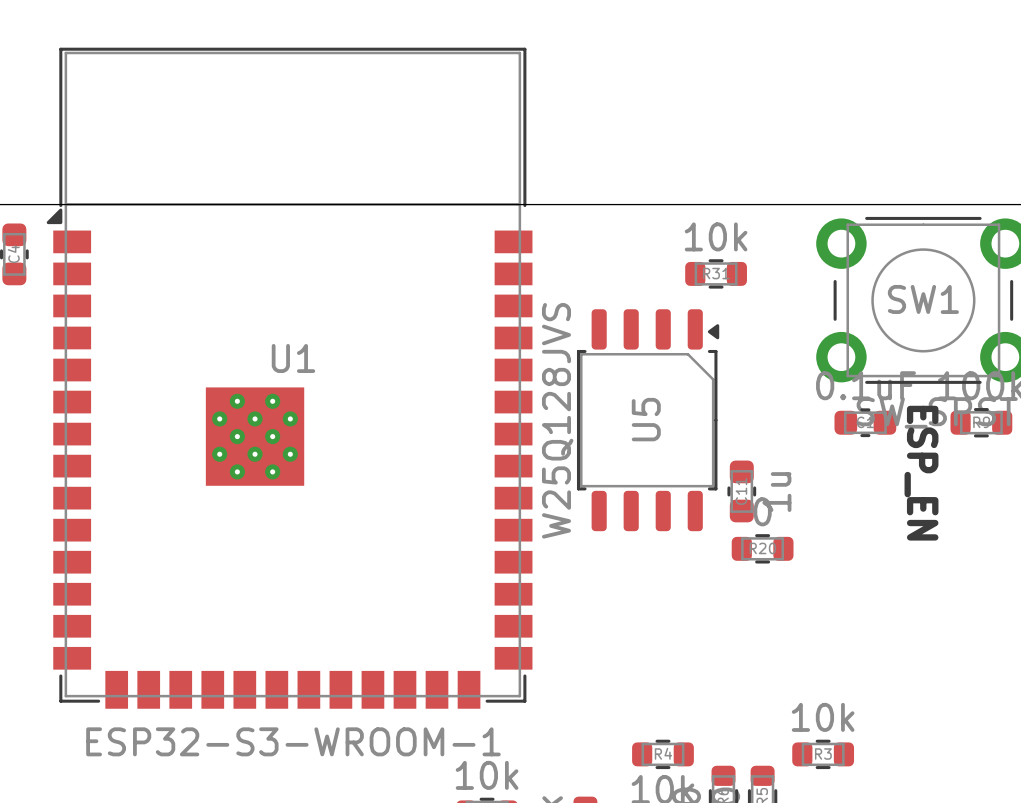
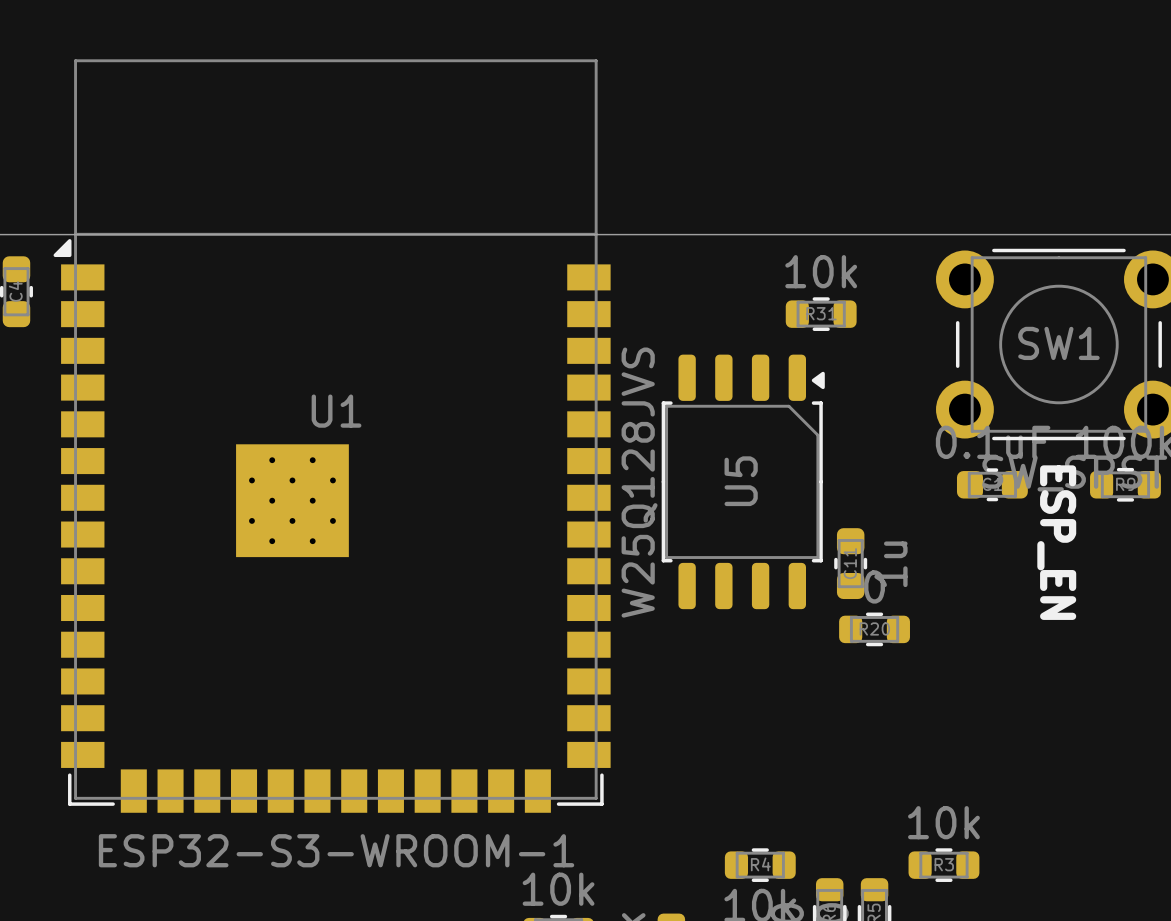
U1 footprint: [46, 47, 533, 709] -> [53, 59, 611, 813]

